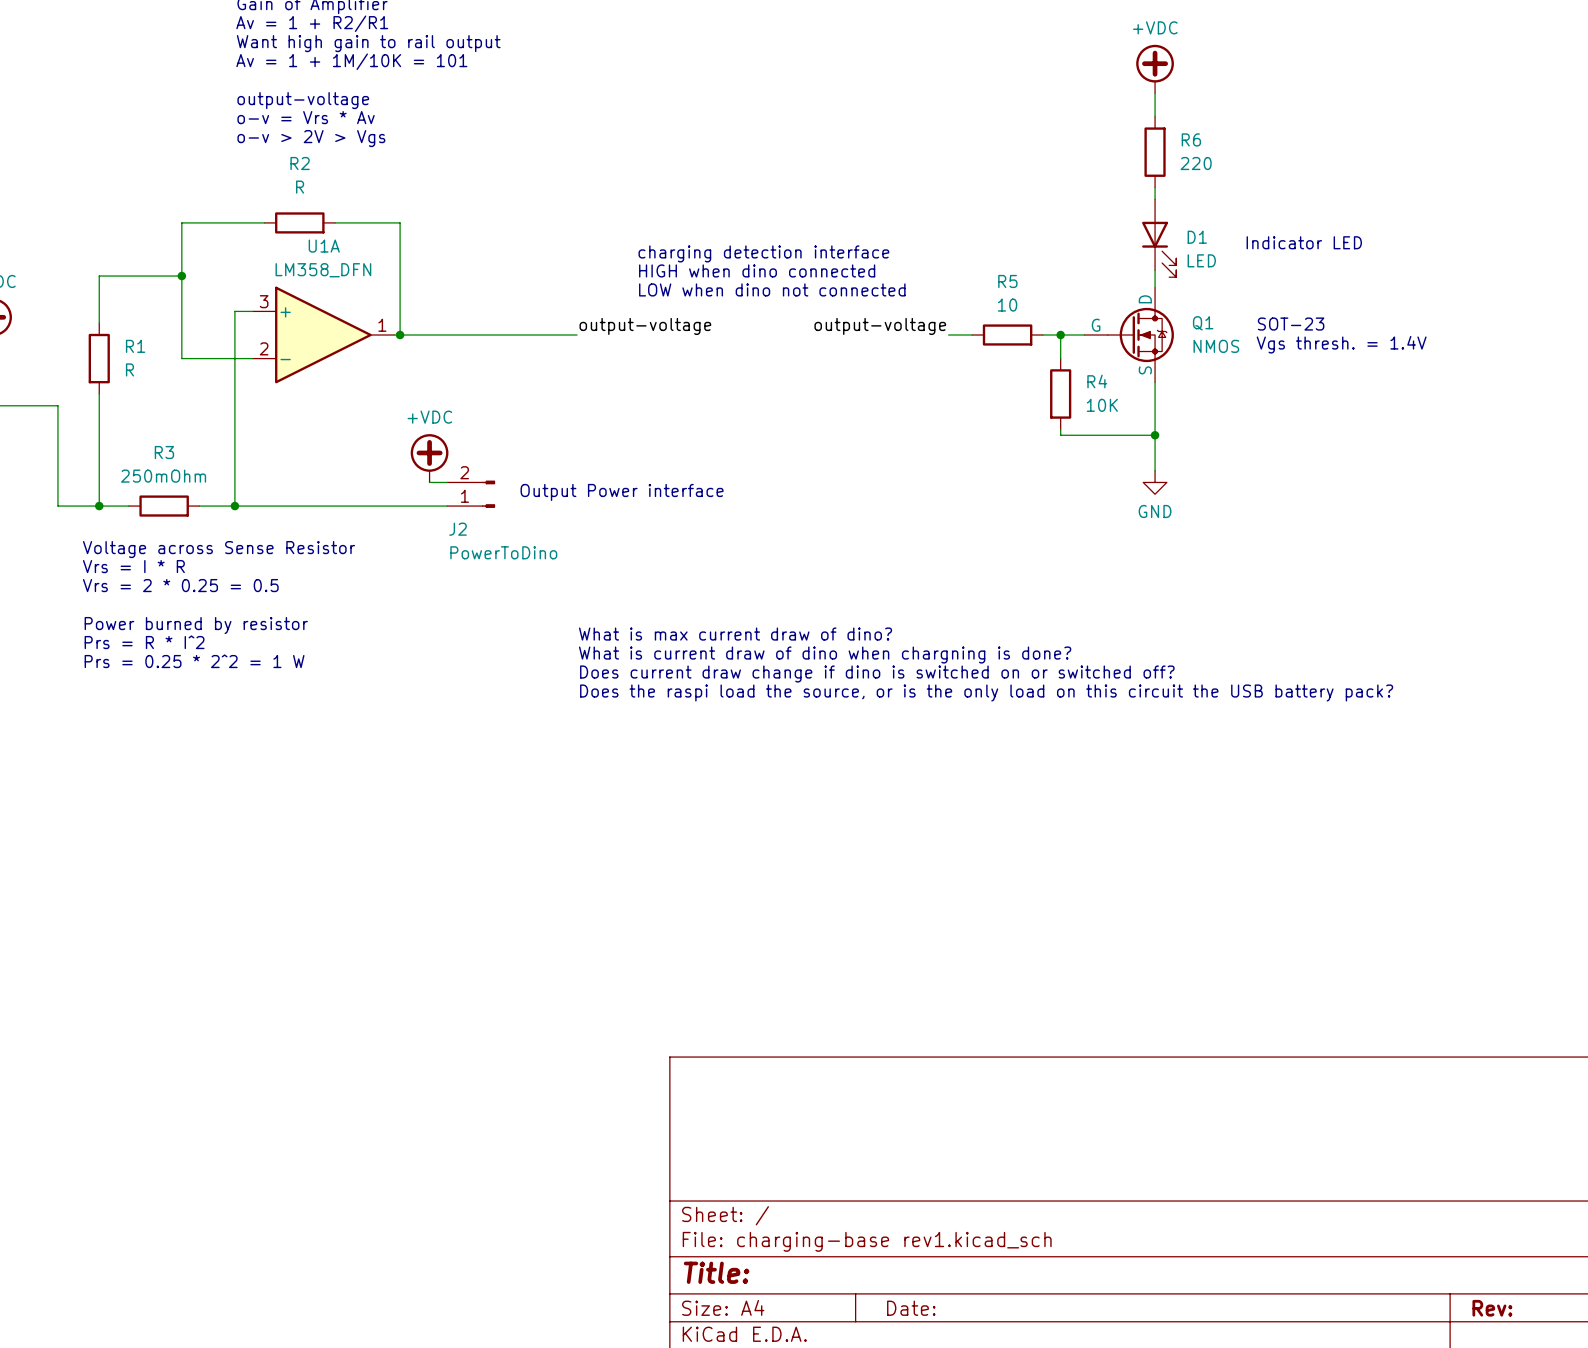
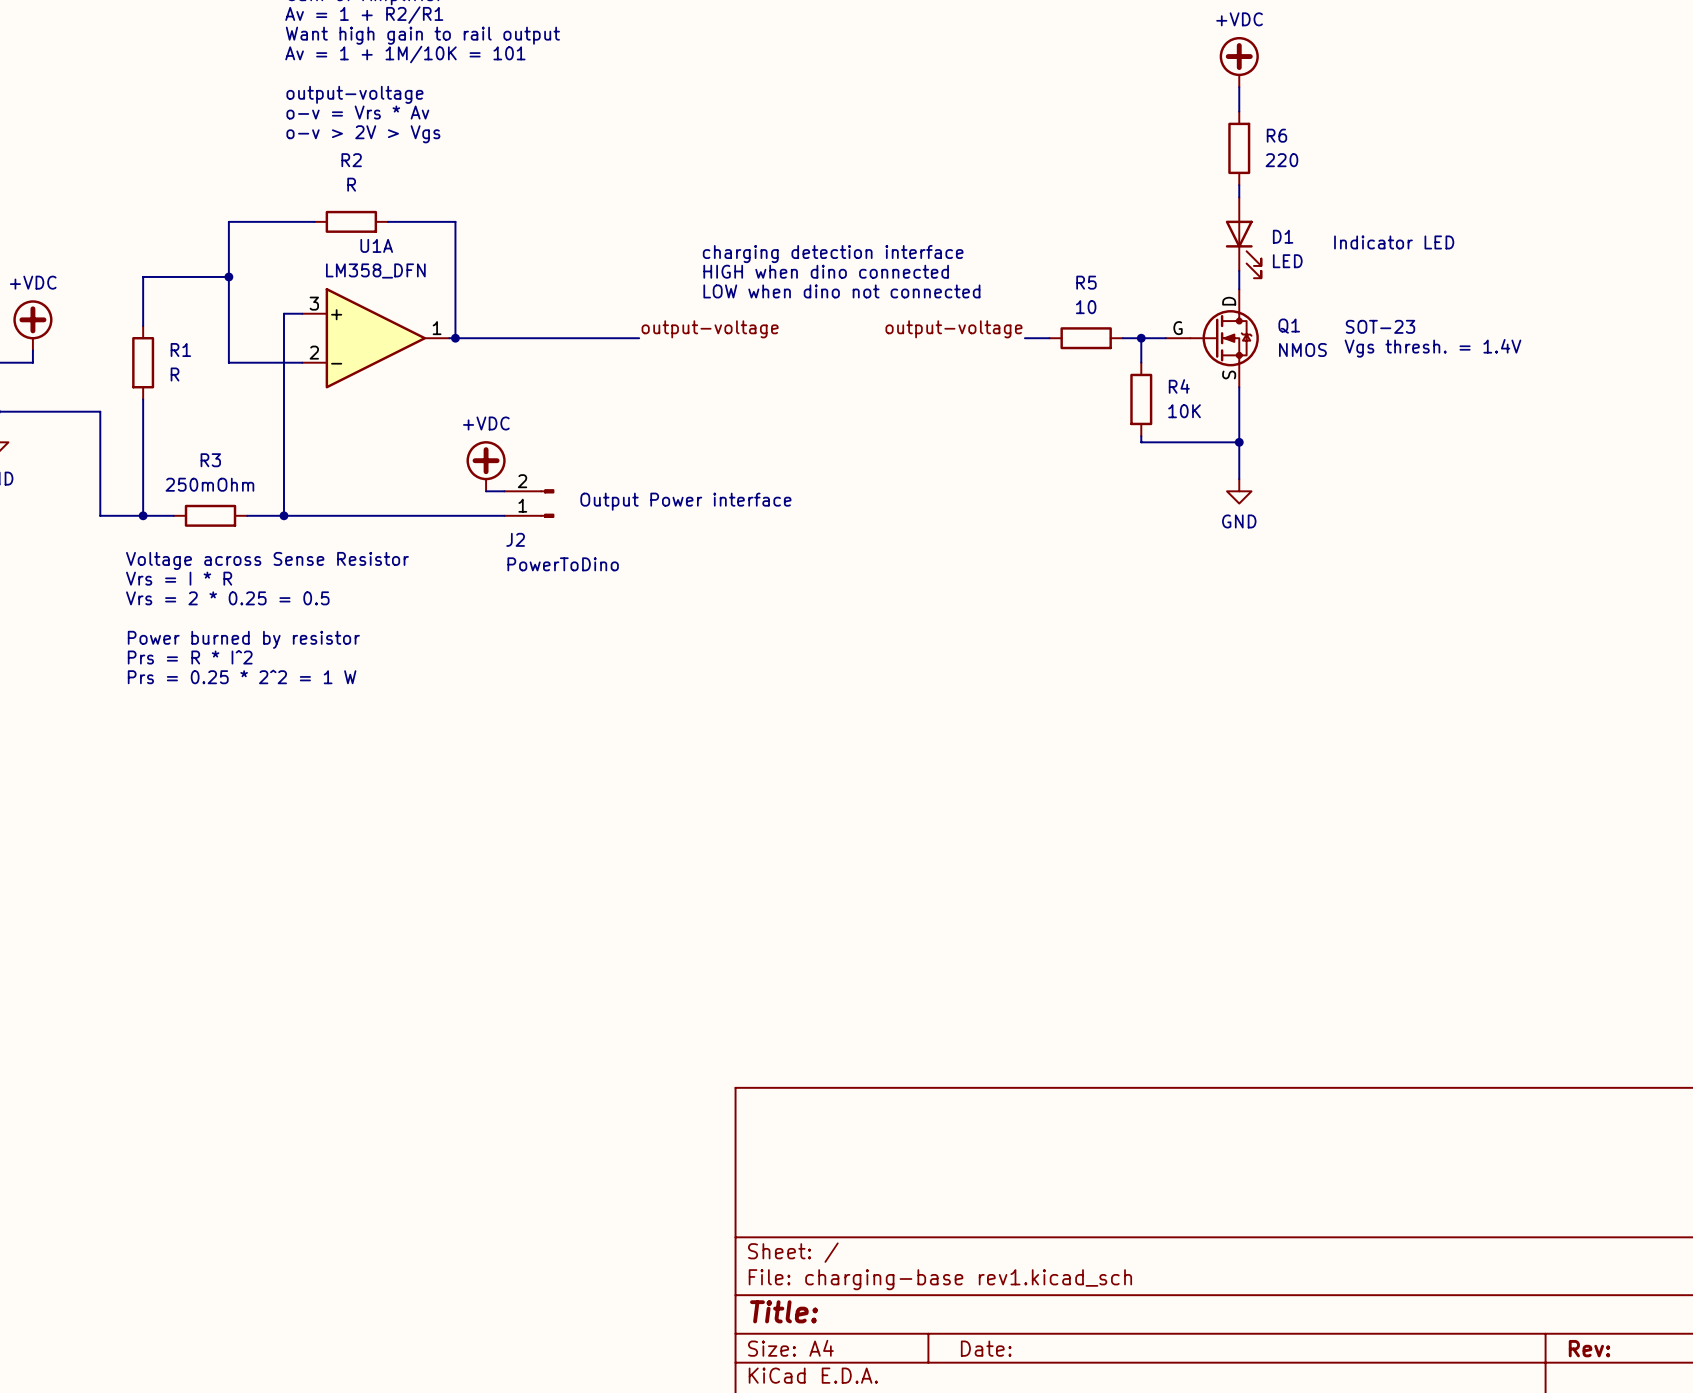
text: What is max current draw of dino? (735, 634) -> none
text: What is current draw of dino when chargning is done? (825, 655) -> none
text: Does current draw change if dino is switched on or switched off? (877, 674) -> none
text: Does the raspi load the source, or is the only load on this circuit the USB battery pack? (986, 692) -> none

